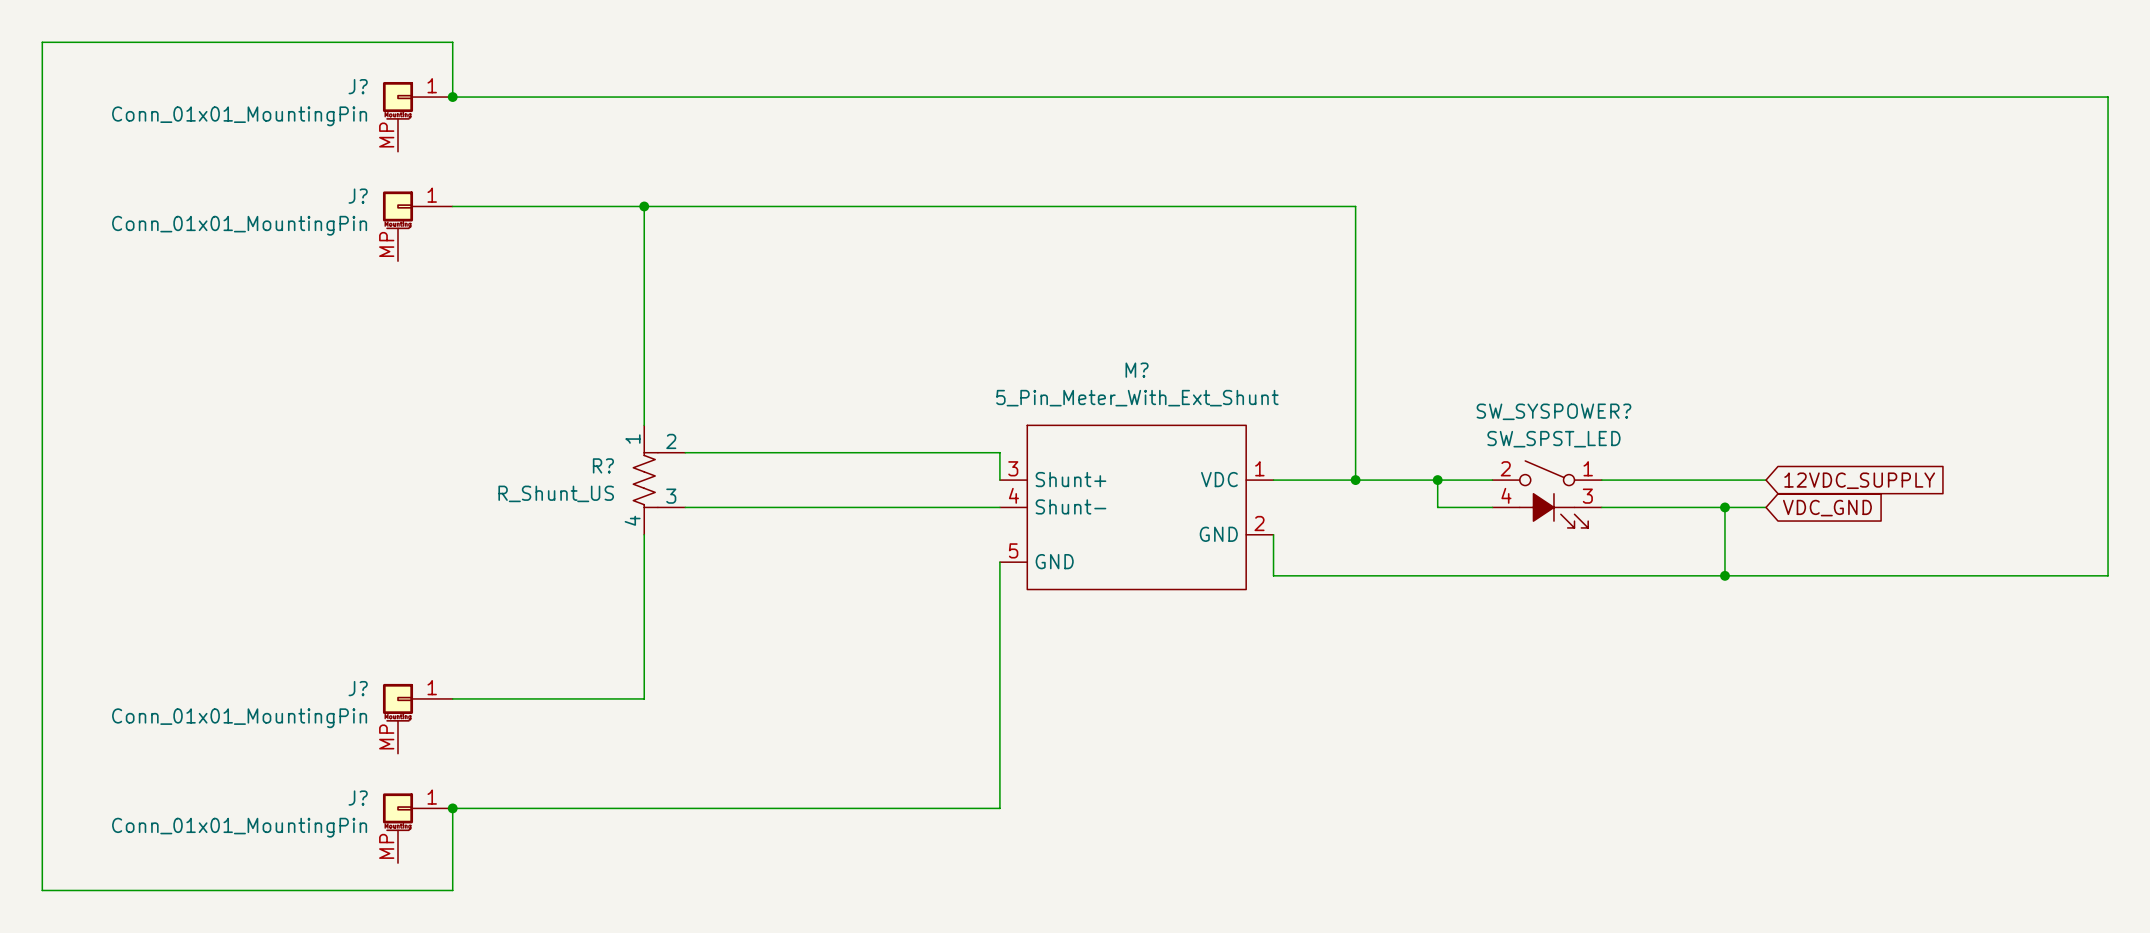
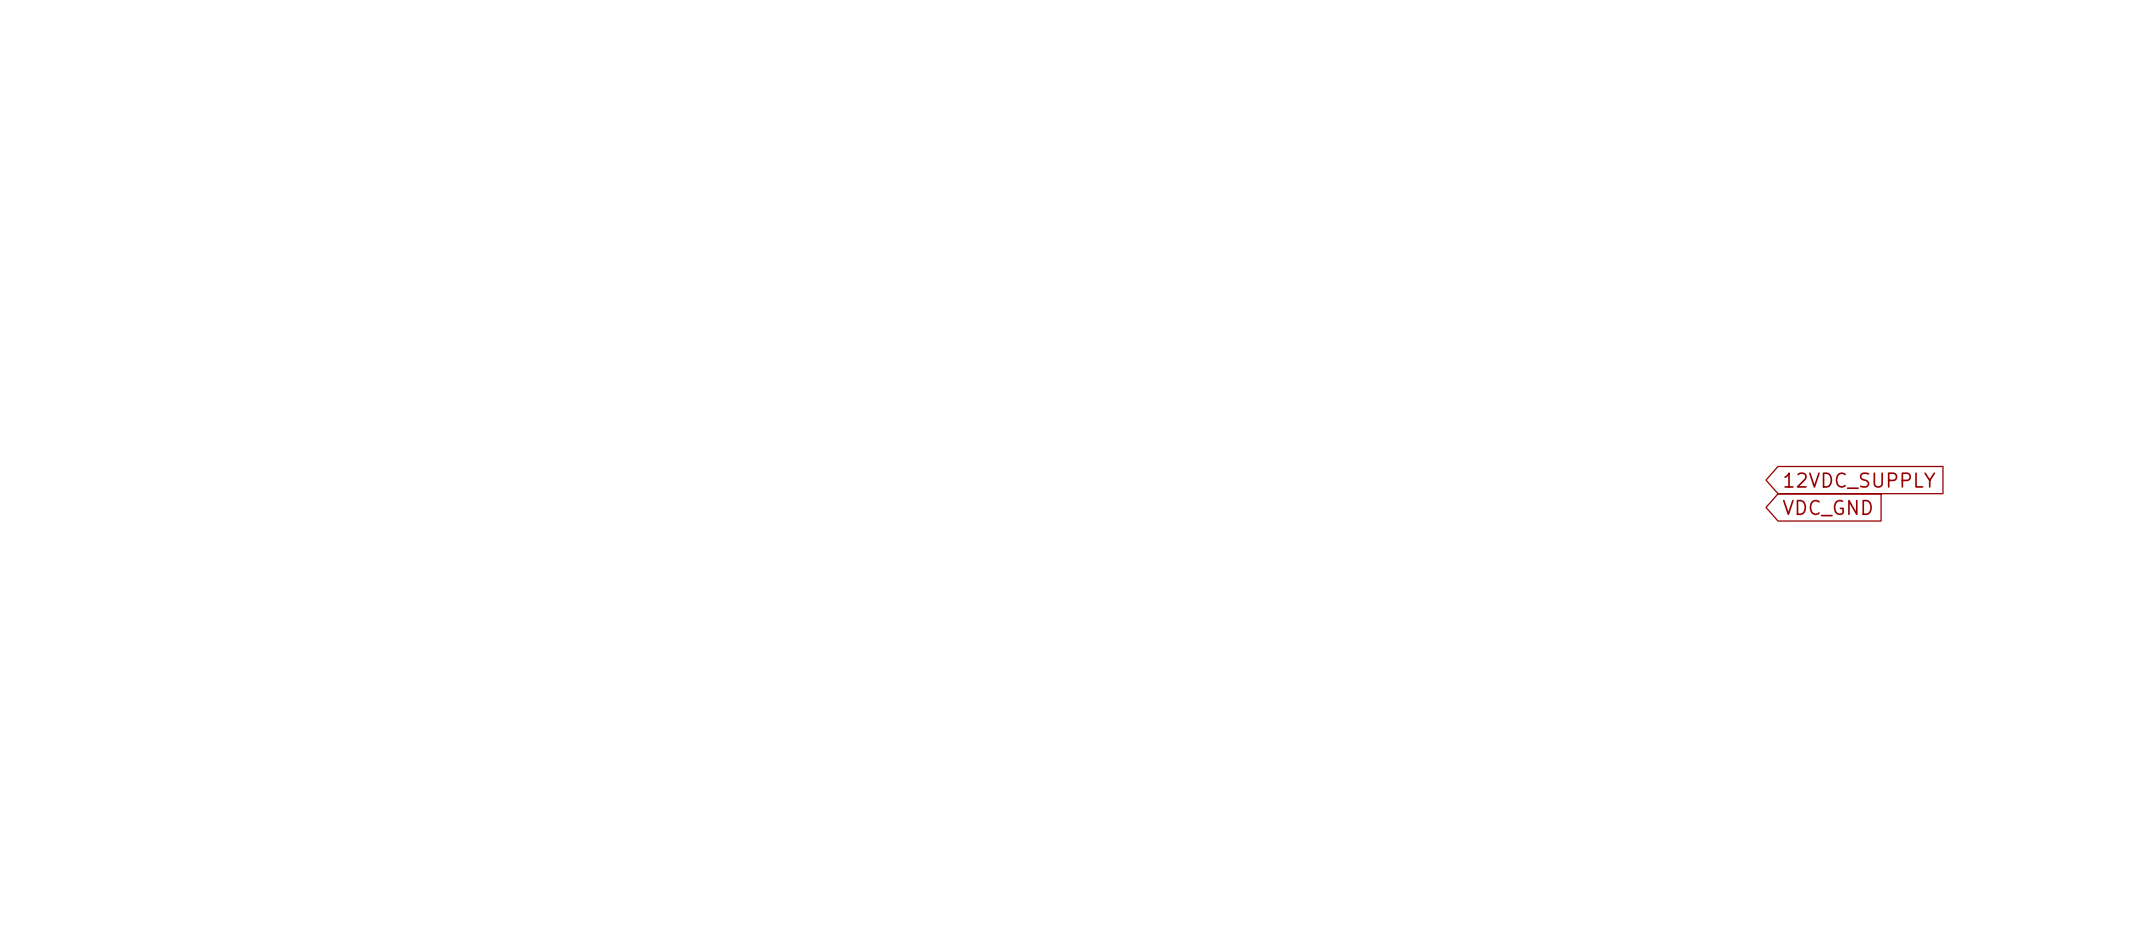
junction: (452, 97) -> none
J?: Conn_01x01_MountingPin (417, 116) -> none
wire: (452, 206) (1355, 206) (1355, 480) -> none
wire: (644, 206) (644, 425) -> none
junction: (644, 206) -> none
J?: Conn_01x01_MountingPin (417, 226) -> none
wire: (685, 452) (999, 452) (999, 480) -> none
R?: R_Shunt_US (659, 480) -> none
wire: (1273, 480) (1492, 480) -> none
junction: (1355, 480) -> none
wire: (1437, 480) (1437, 507) (1492, 507) -> none
junction: (1437, 480) -> none
wire: (1601, 480) (1766, 480) -> none
SW_SYSPOWER?: SW_SPST_LED (1547, 494) -> none
wire: (685, 507) (999, 507) -> none
M?: 5_Pin_Meter_With_Ext_Shunt (1136, 507) -> none
wire: (1601, 507) (1766, 507) -> none
wire: (1724, 507) (1724, 575) -> none
junction: (1724, 507) -> none
wire: (644, 534) (644, 698) (452, 698) -> none
wire: (1273, 534) (1273, 575) (2108, 575) (2108, 97) (452, 97) (452, 42) (42, 42) (42, 890) (452, 890) (452, 808) (999, 808) (999, 562) -> none
junction: (1724, 575) -> none
J?: Conn_01x01_MountingPin (417, 718) -> none
junction: (452, 808) -> none
J?: Conn_01x01_MountingPin (417, 828) -> none

